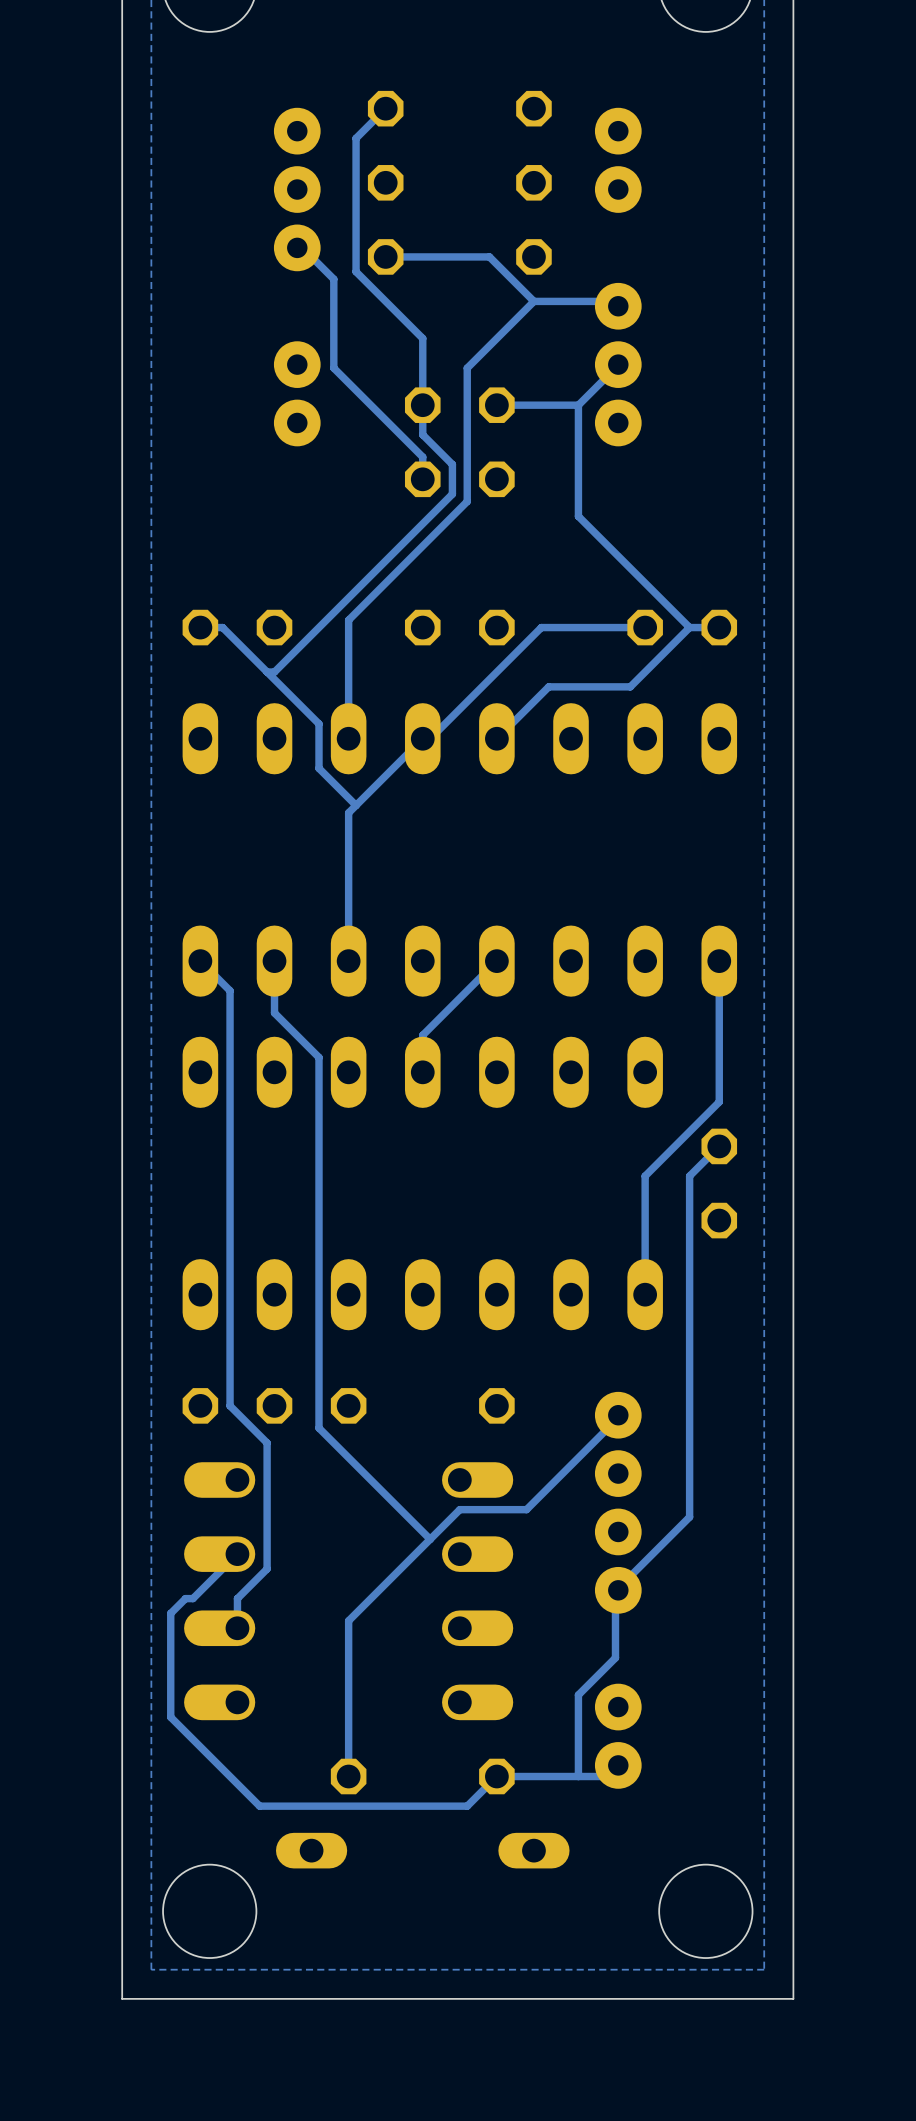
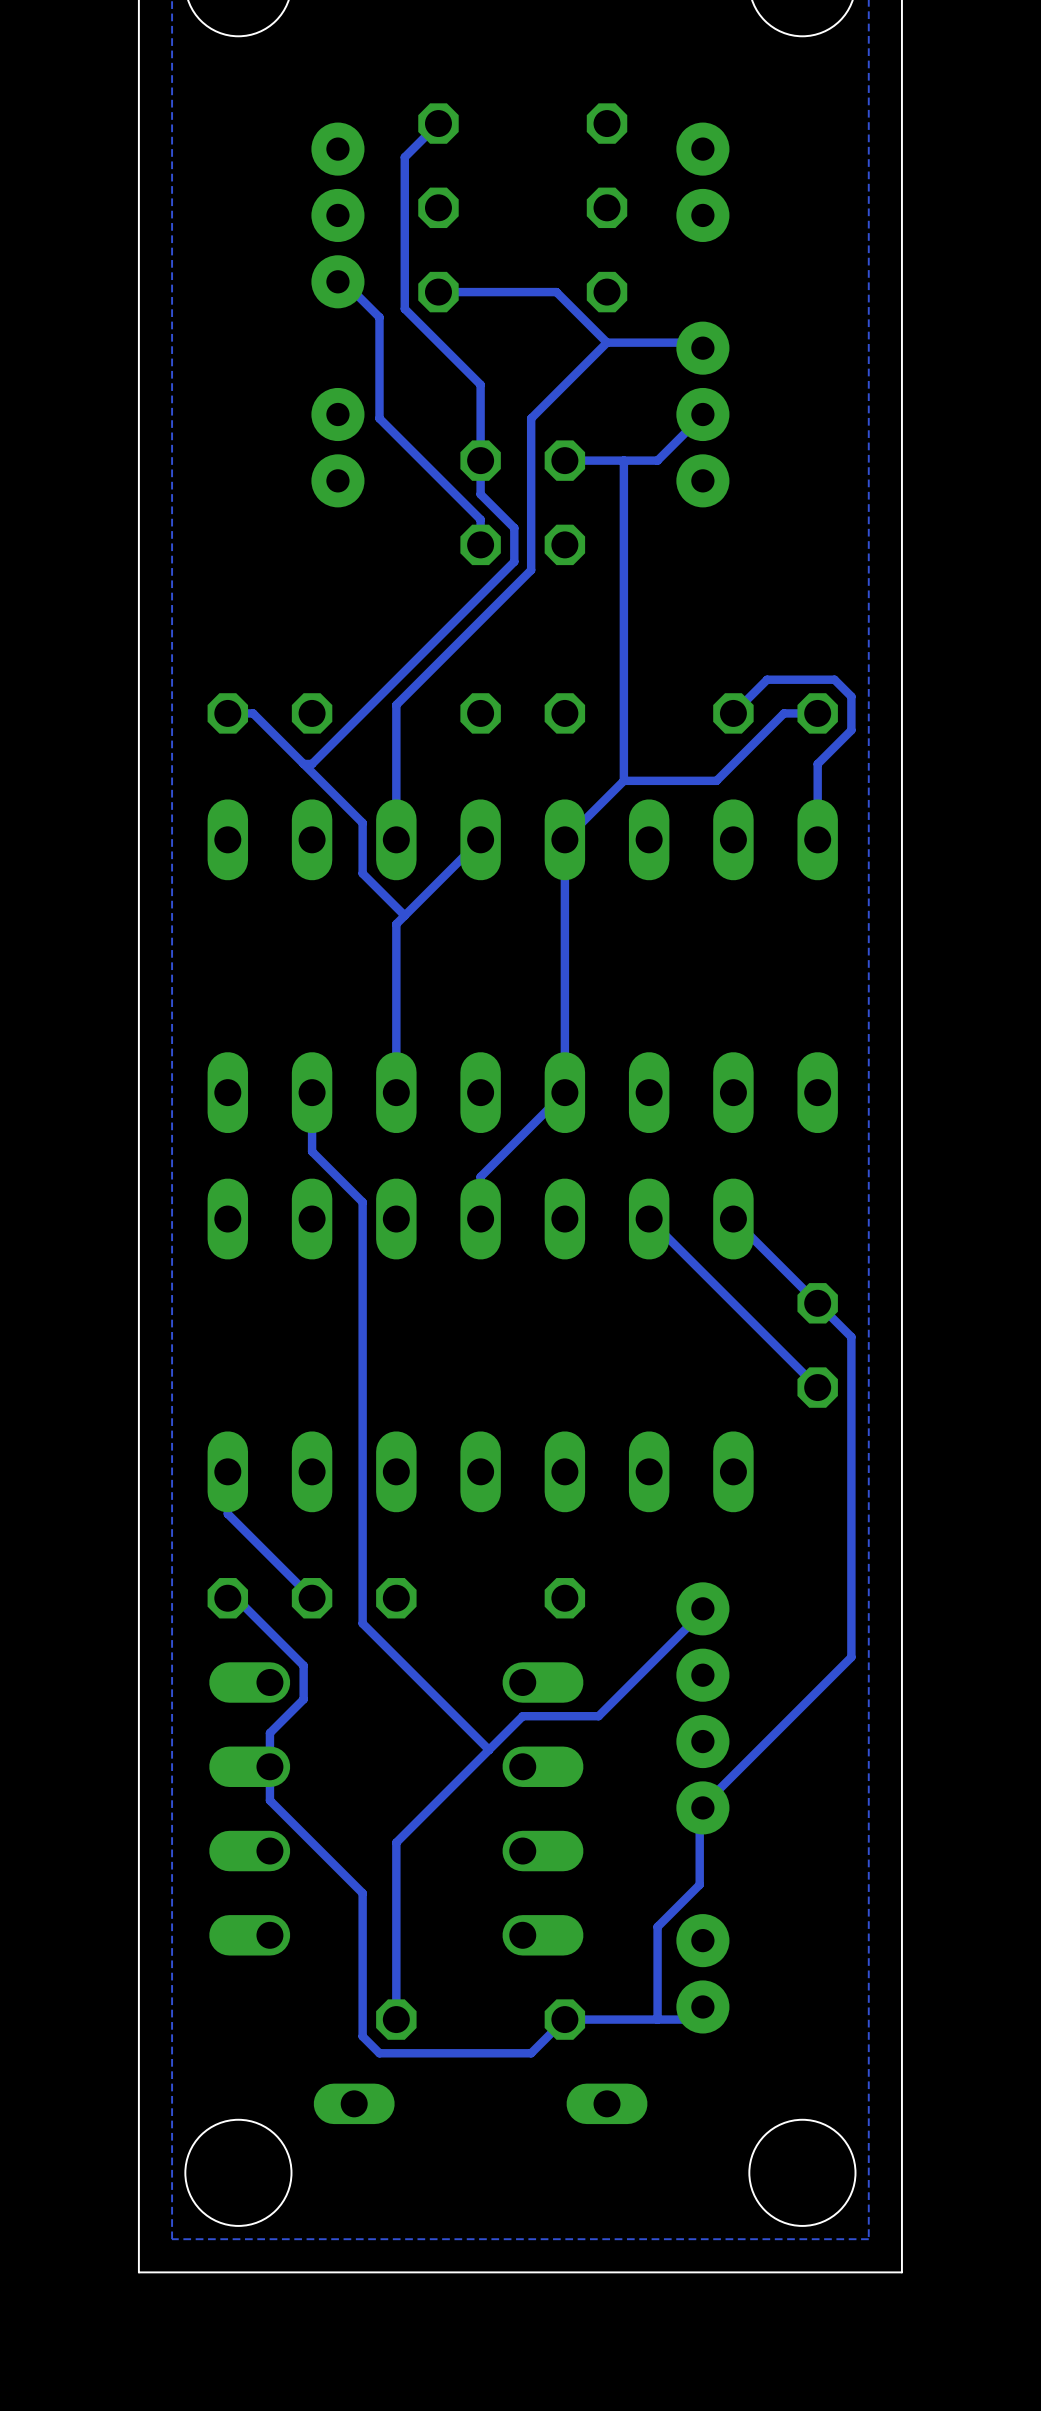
track: none -> (623, 460) (623, 780)
track: (578, 405) (578, 516) (689, 627) -> none
track: (645, 627) (541, 627) (430, 738) (422, 738) -> (733, 713) (767, 679) (834, 679) (851, 696) (851, 730) (817, 763) (817, 839)
track: none -> (564, 839) (564, 1092)
track: (200, 961) (230, 990) (230, 1405) (267, 1442) (267, 1465) -> (227, 1598) (236, 1598) (303, 1665)
track: (719, 961) (719, 1101) (645, 1176) (645, 1294) -> none
track: none -> (649, 1219) (817, 1387)
track: (719, 1146) (689, 1176) (689, 1517) -> (733, 1219) (851, 1337) (851, 1657) (783, 1724)
track: none -> (227, 1471) (227, 1513) (312, 1598)
track: (267, 1494) (267, 1568) (237, 1598) (237, 1628) -> none
track: (237, 1554) (192, 1598) (185, 1598) (170, 1613) (170, 1717) (259, 1806) (333, 1806) -> (303, 1699) (269, 1733) (269, 1800) (362, 1893) (362, 2036) (379, 2053)

